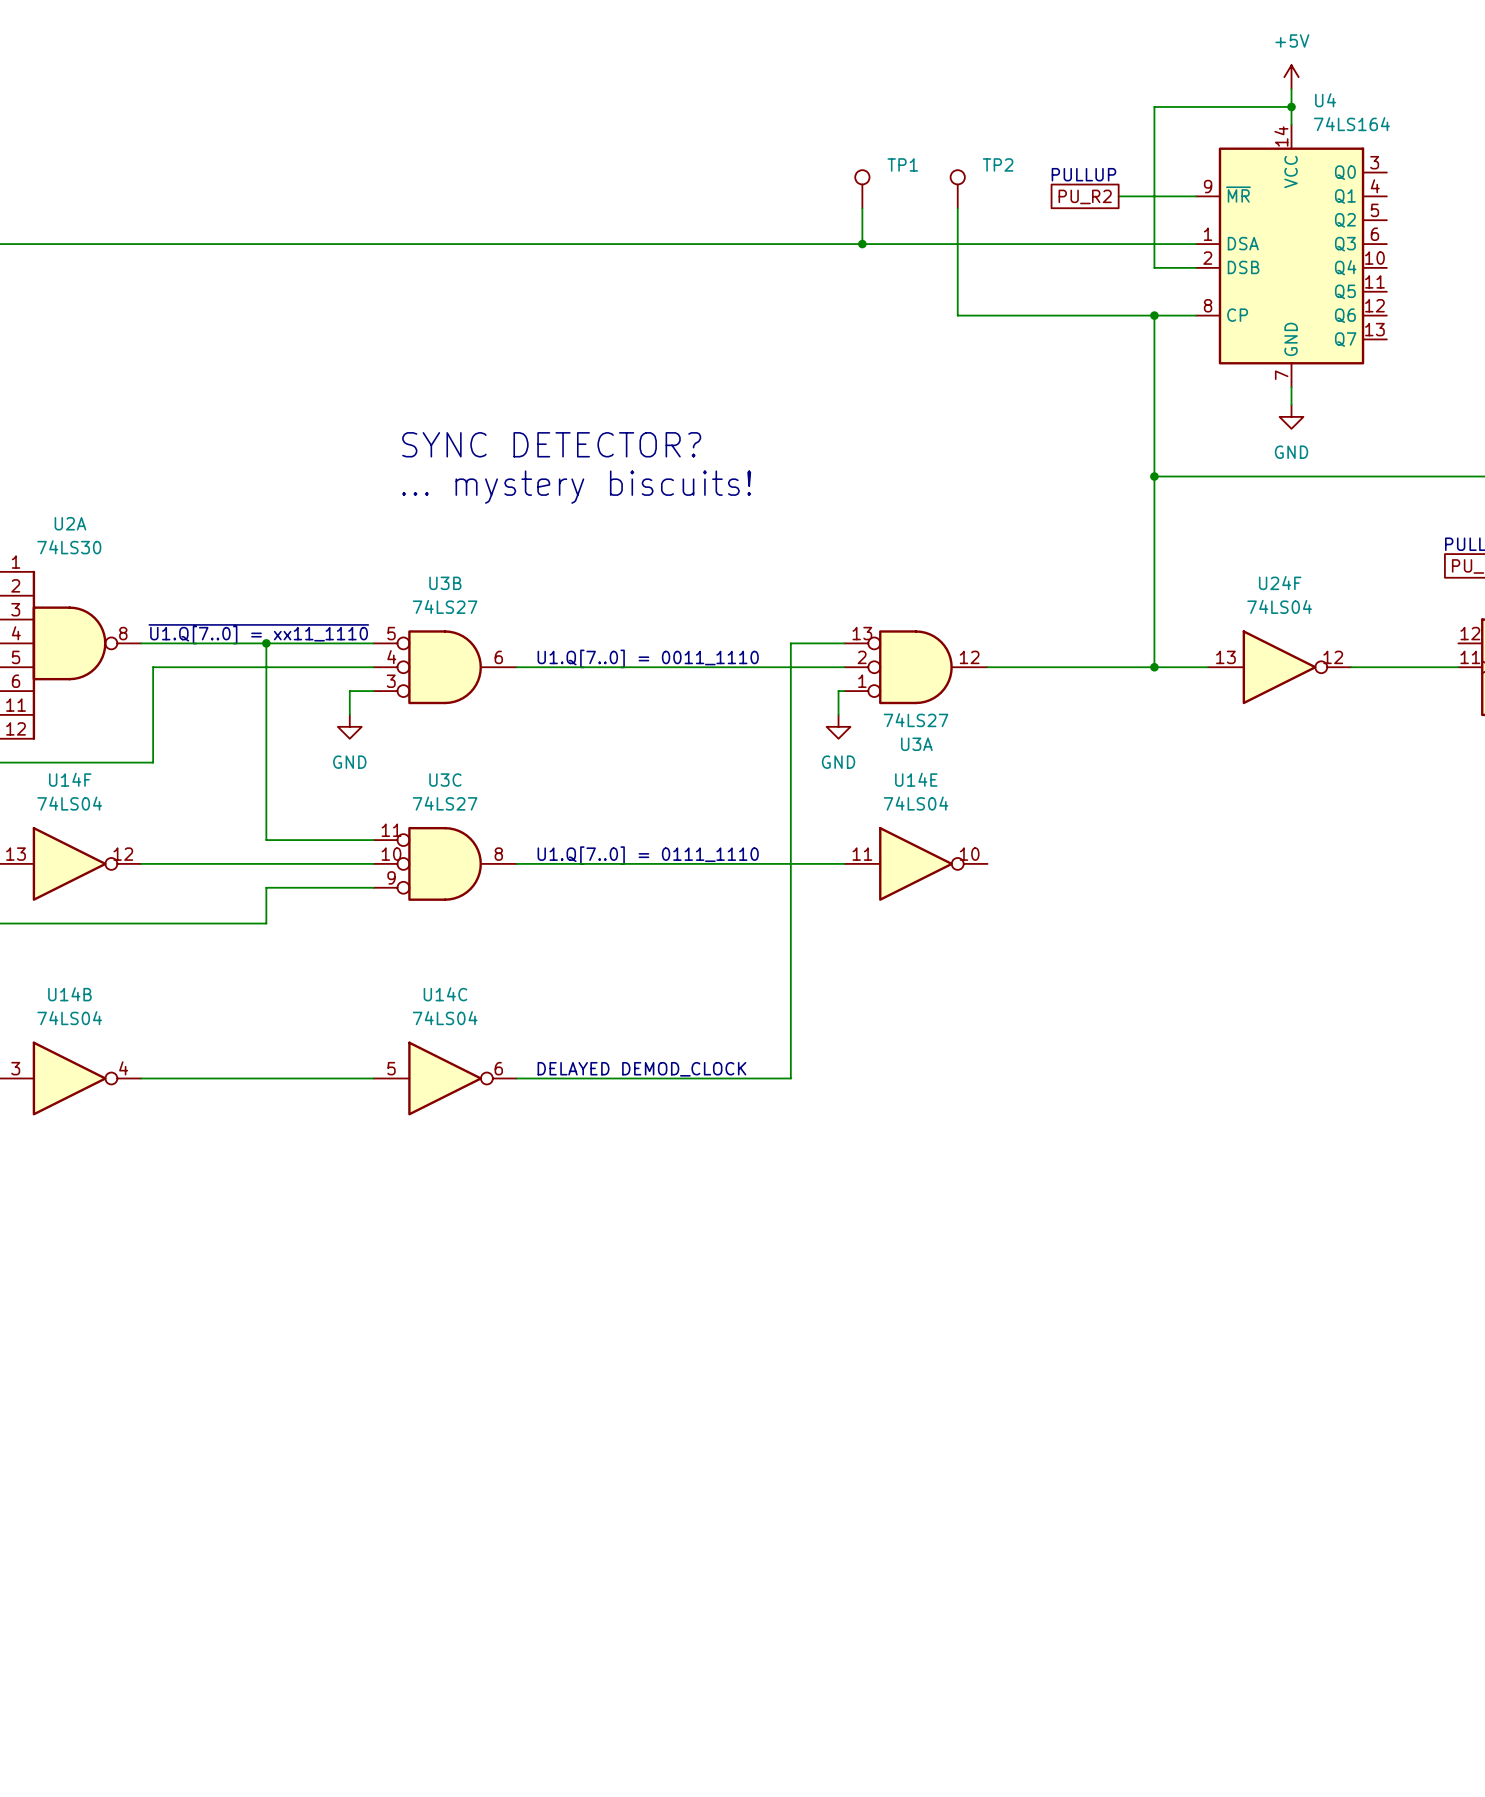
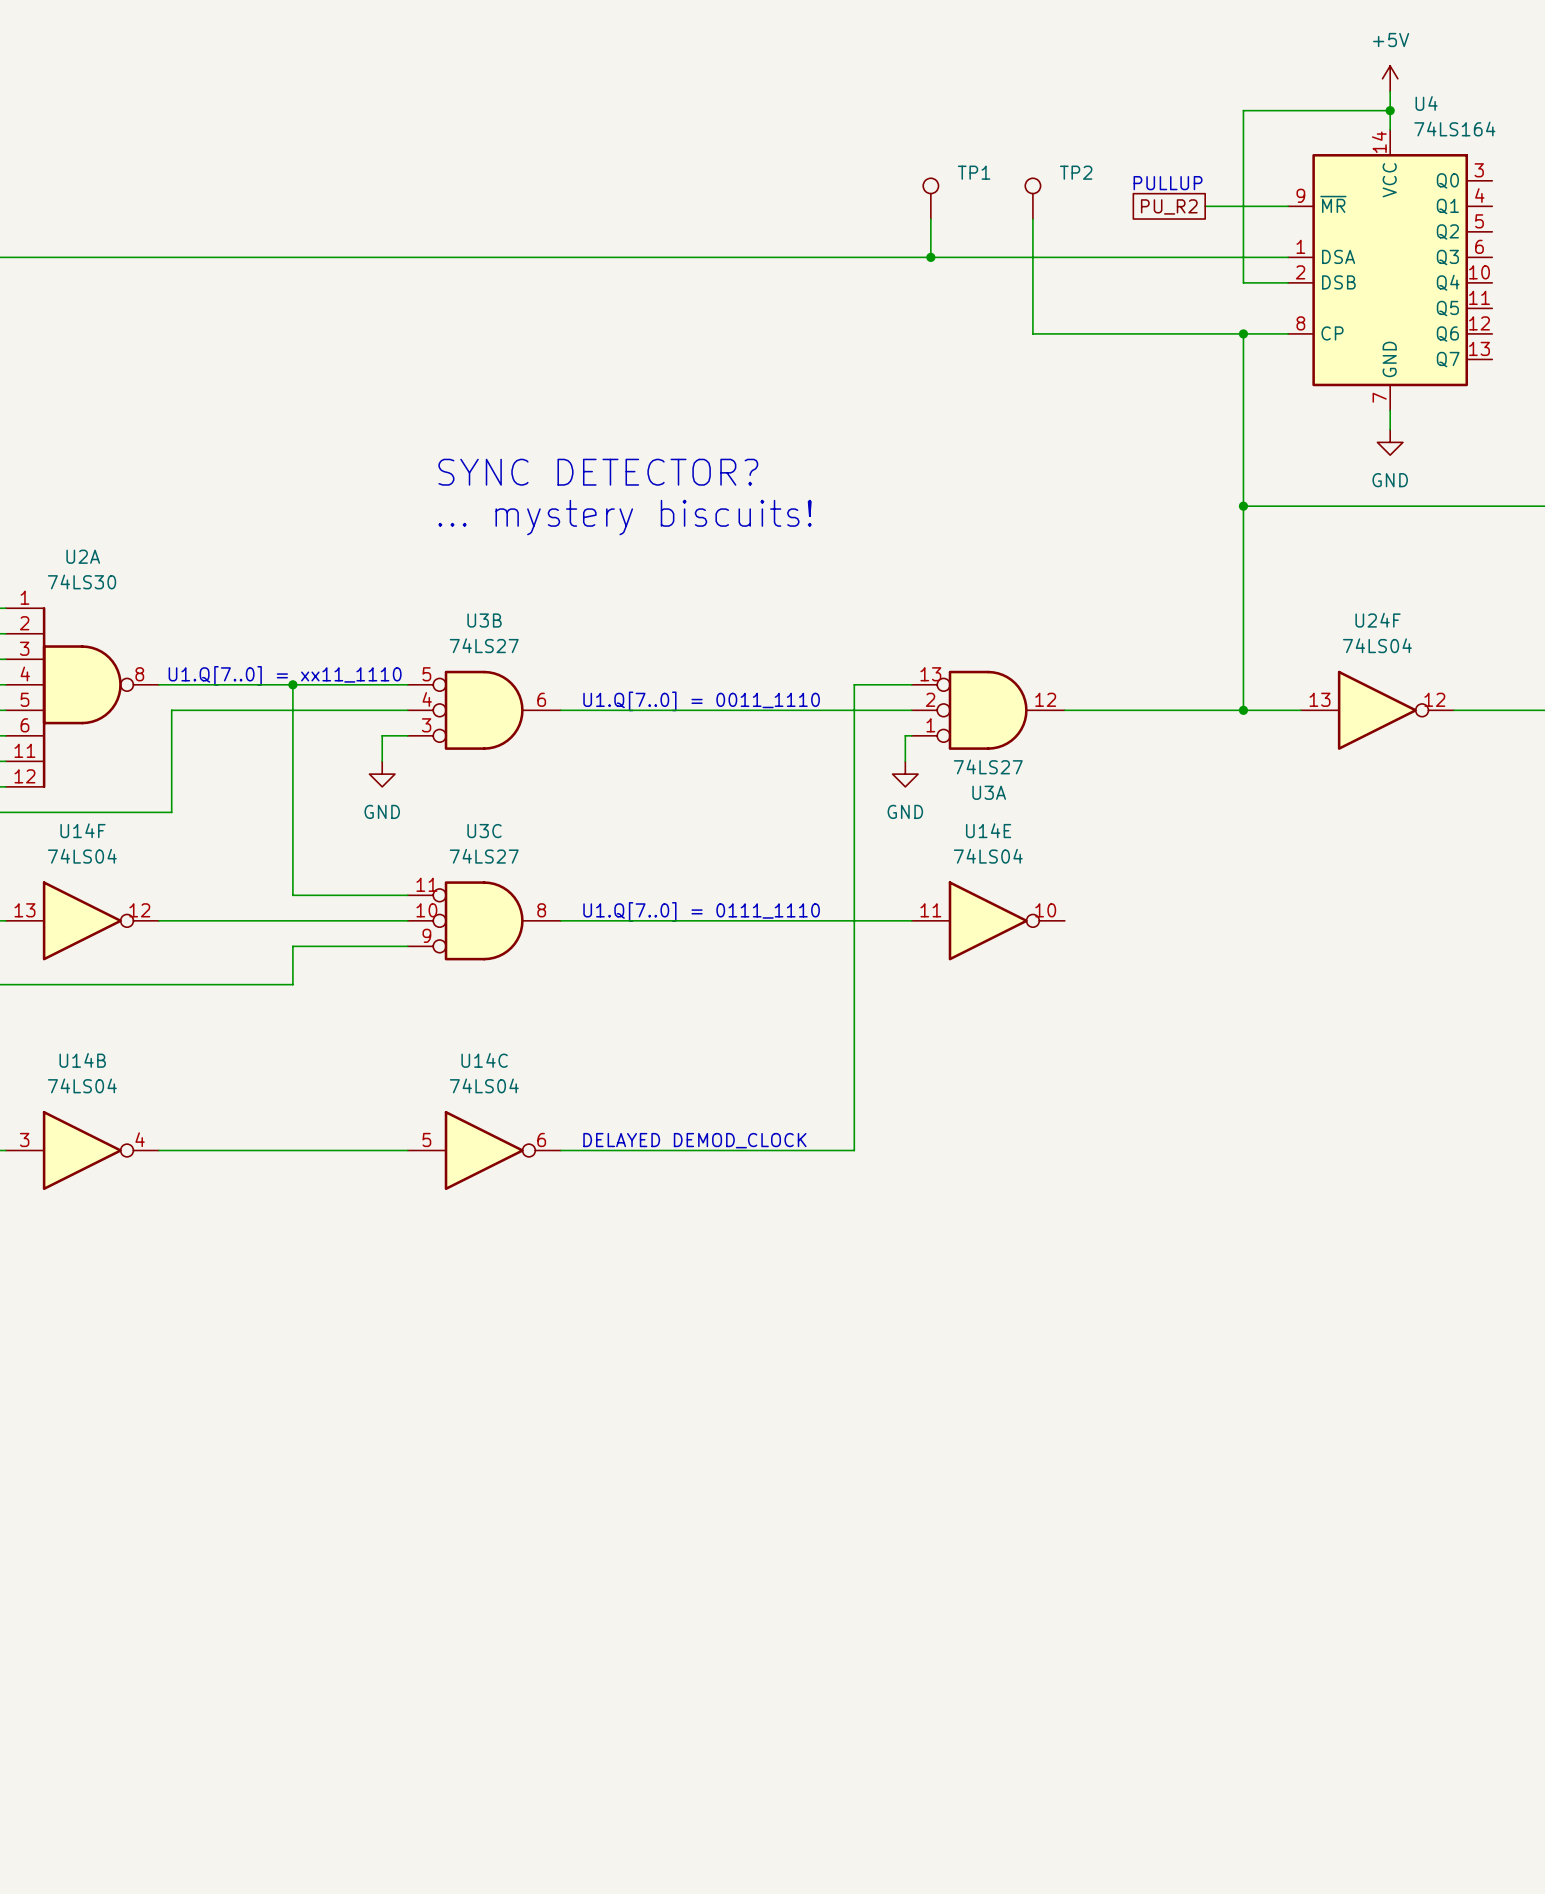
text: ~{U1.Q[7..0] = xx11_1110} (258, 634) -> U1.Q[7..0] = xx11_1110 (285, 675)

